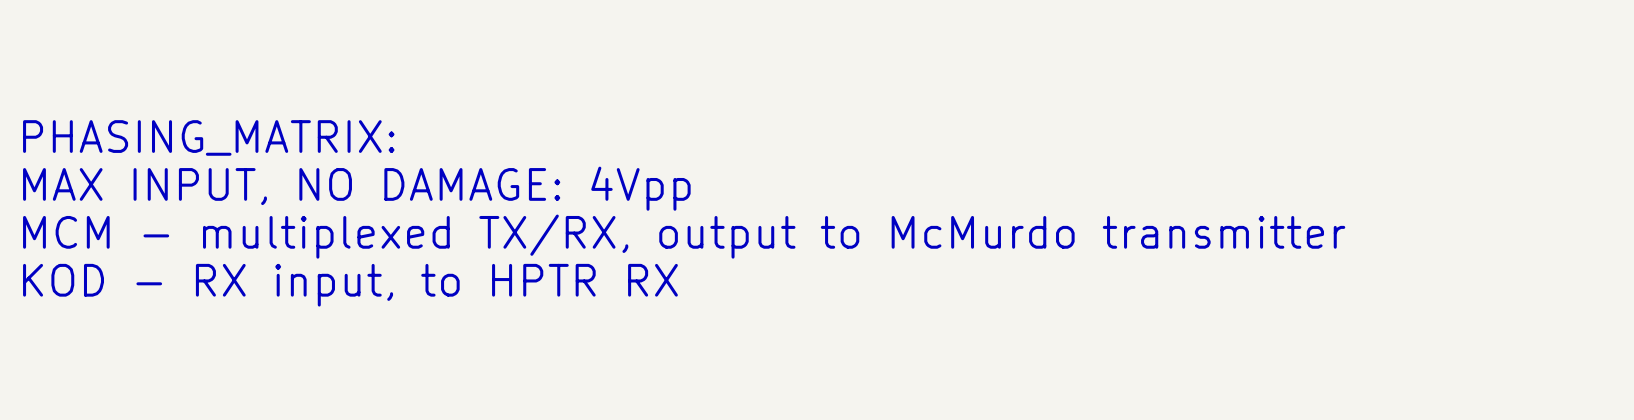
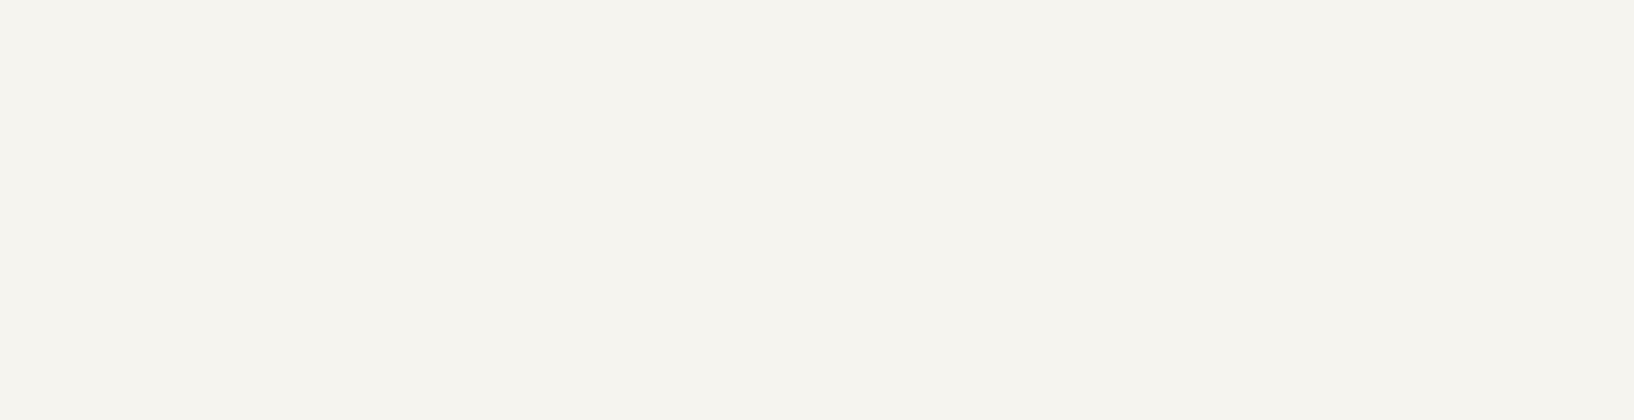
text: PHASING_MATRIX: (208, 137) -> none
text: MAX INPUT, NO DAMAGE: 4Vpp (356, 188) -> none
text: MCM - multiplexed TX/RX, output to McMurdo transmitter (684, 236) -> none
text: KOD - RX input, to HPTR RX (350, 285) -> none

